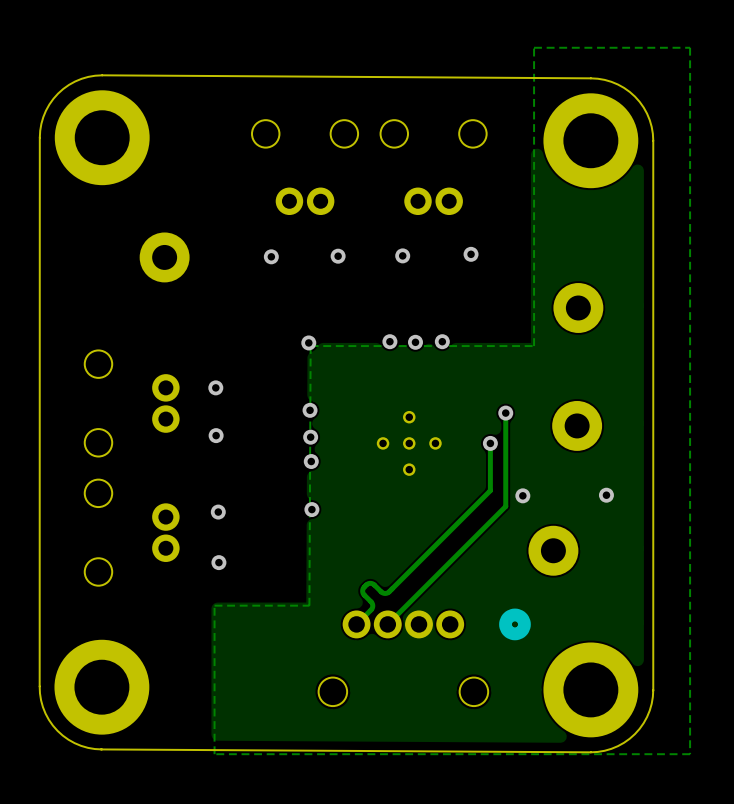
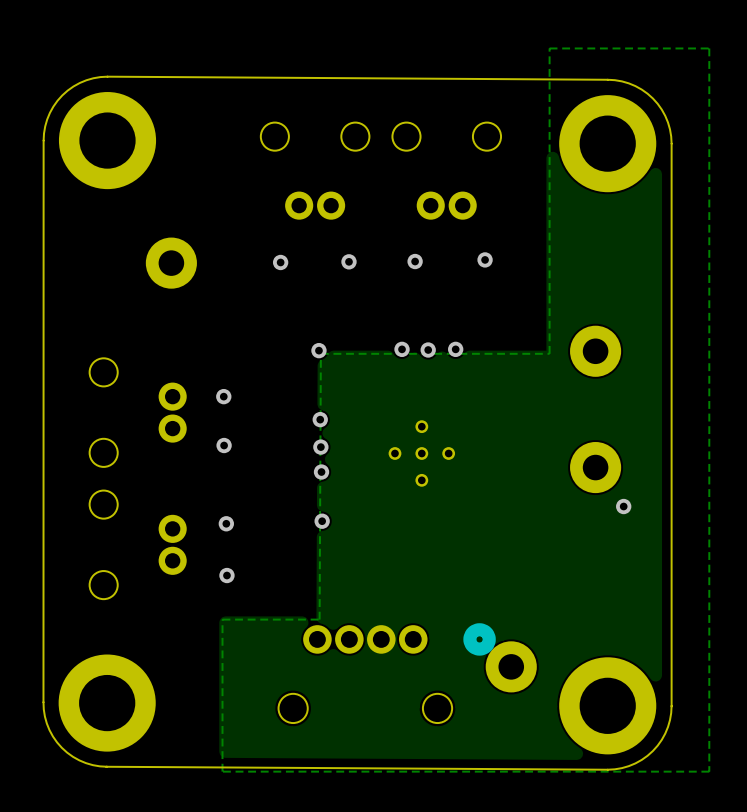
part position: (578, 307) -> (595, 351)
track: (505, 413) (505, 506) (387, 624) -> none
via: (505, 413) -> none
part position: (577, 425) -> (595, 467)
track: (490, 443) (490, 490) (388, 592) (382, 592) (371, 583) (364, 587) (362, 592) (371, 602) (372, 607) (356, 624) -> none
via: (490, 443) -> none
via: (522, 495) -> none
part: (553, 550) -> none
part: none -> (511, 666)
part position: (424, 657) -> (387, 673)

